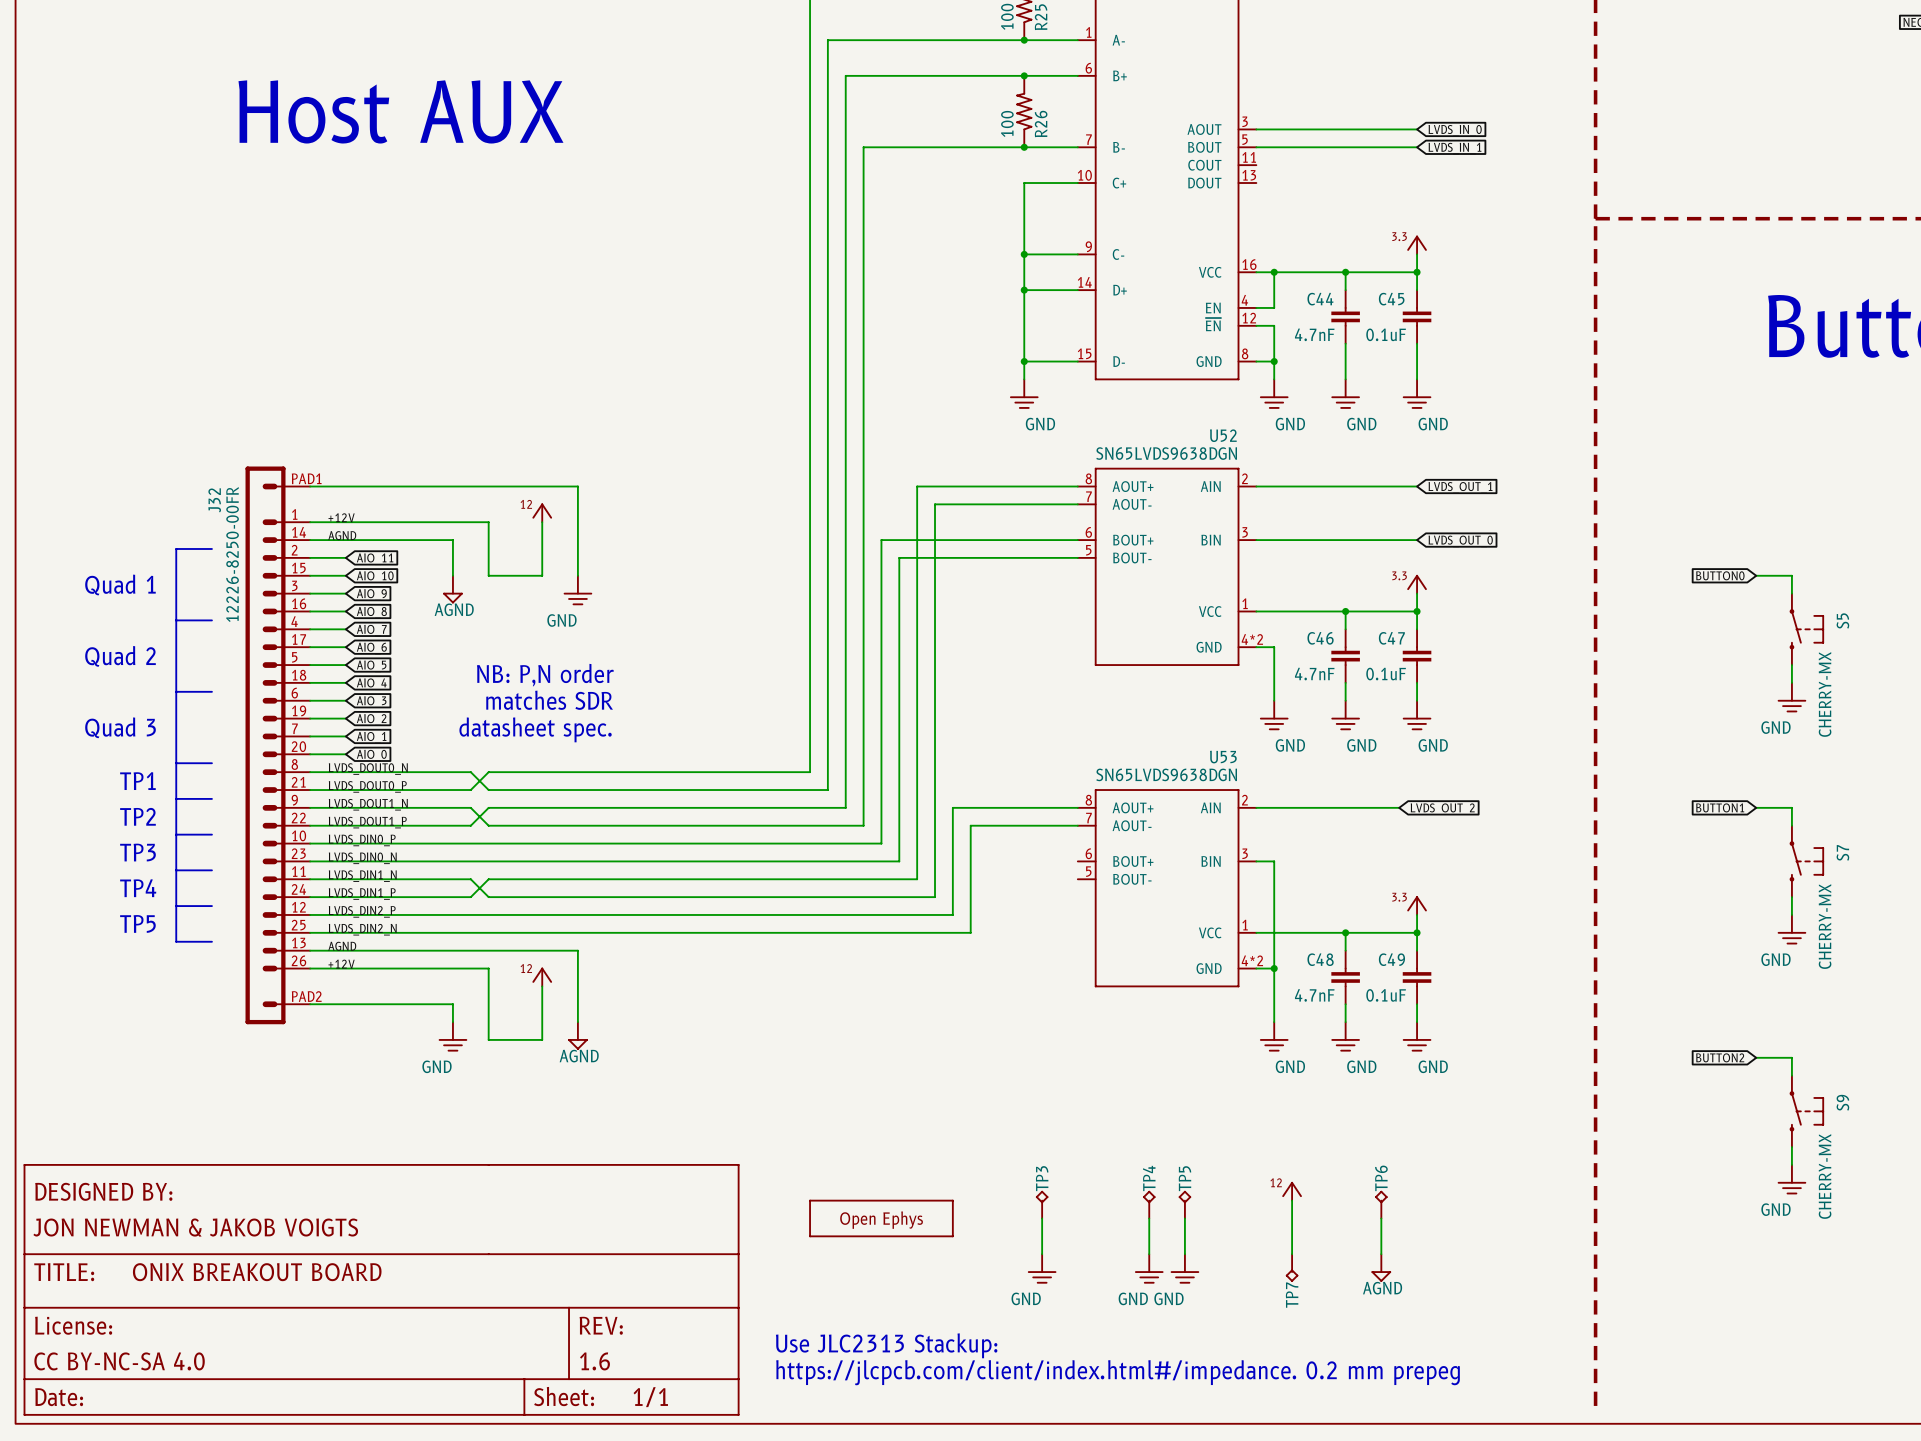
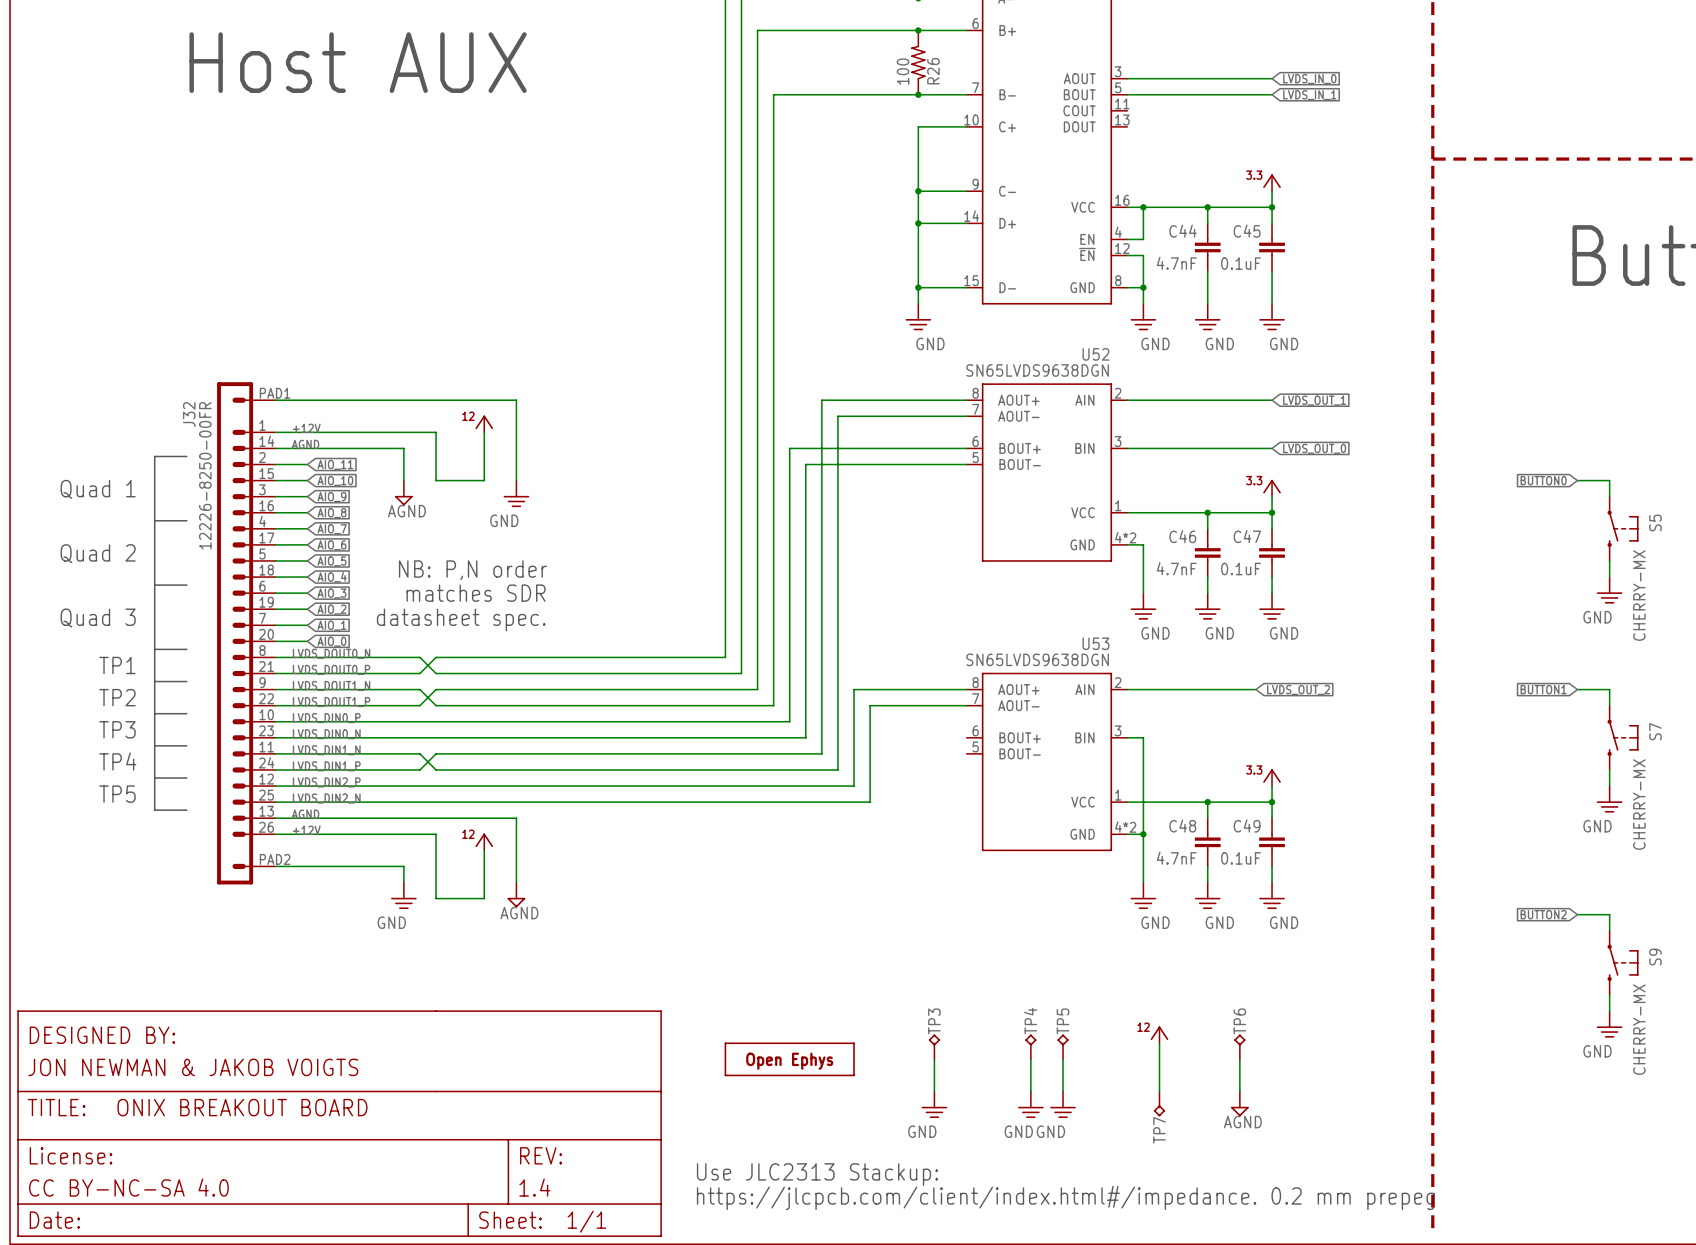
part text: 1.6 (594, 1361) -> 1.4 (534, 1187)

